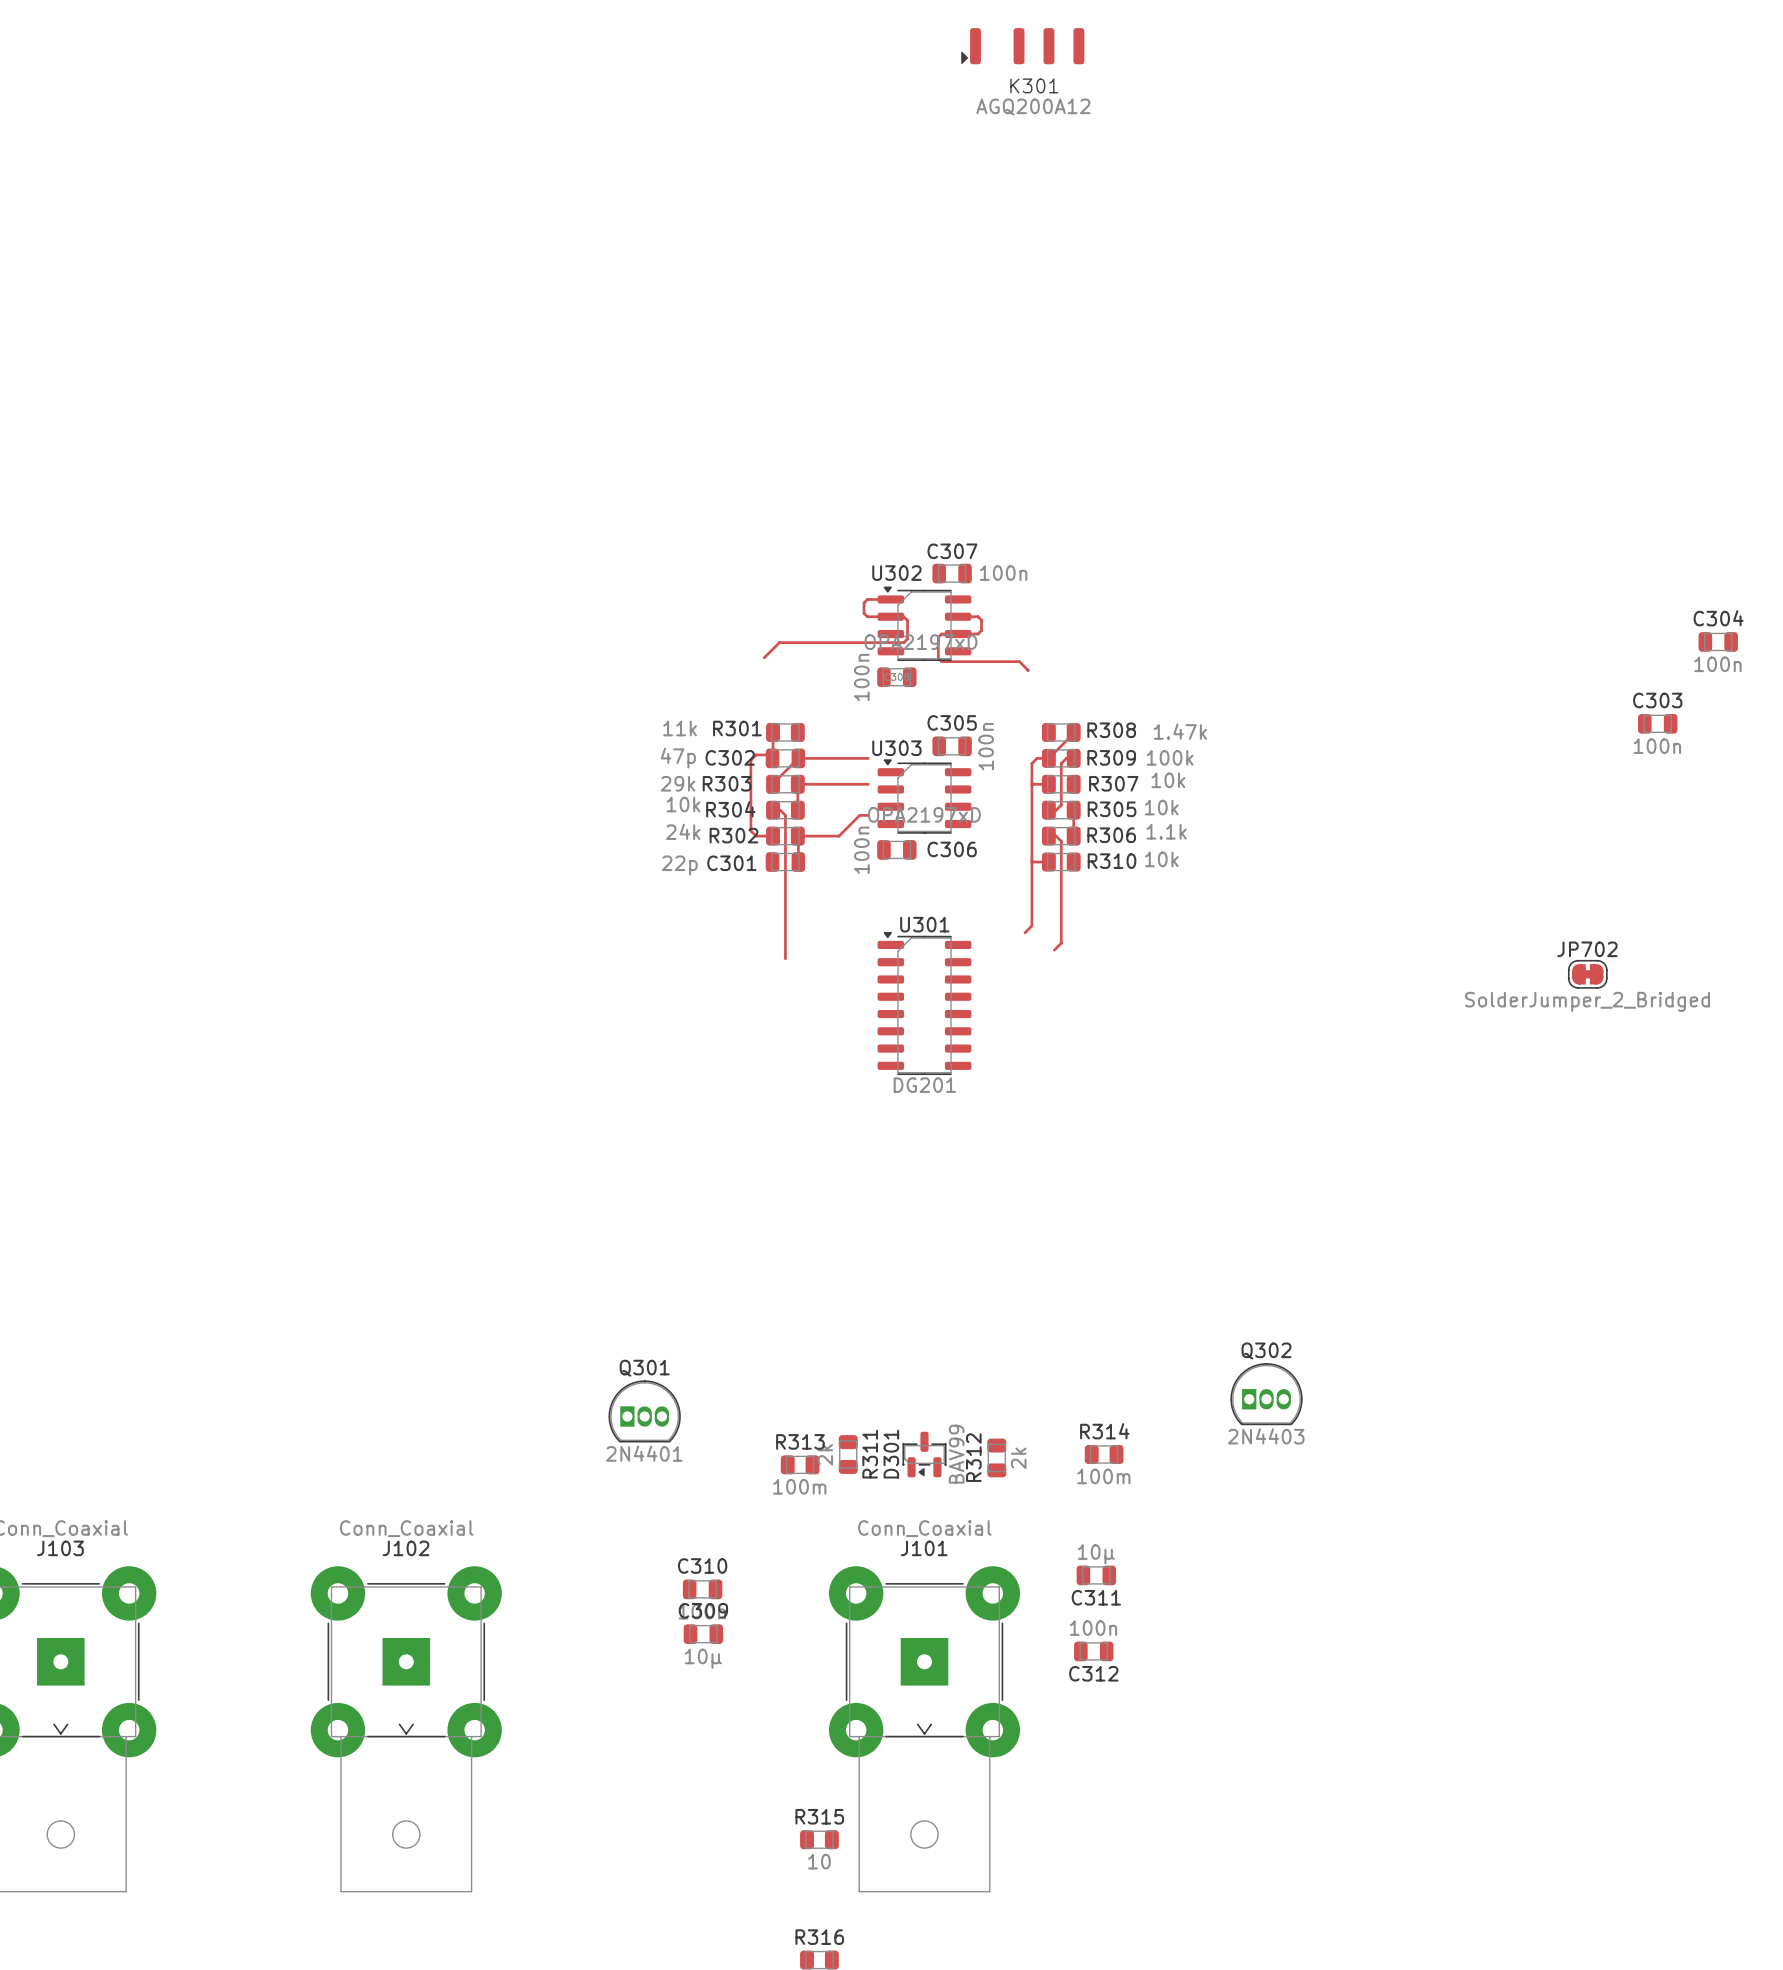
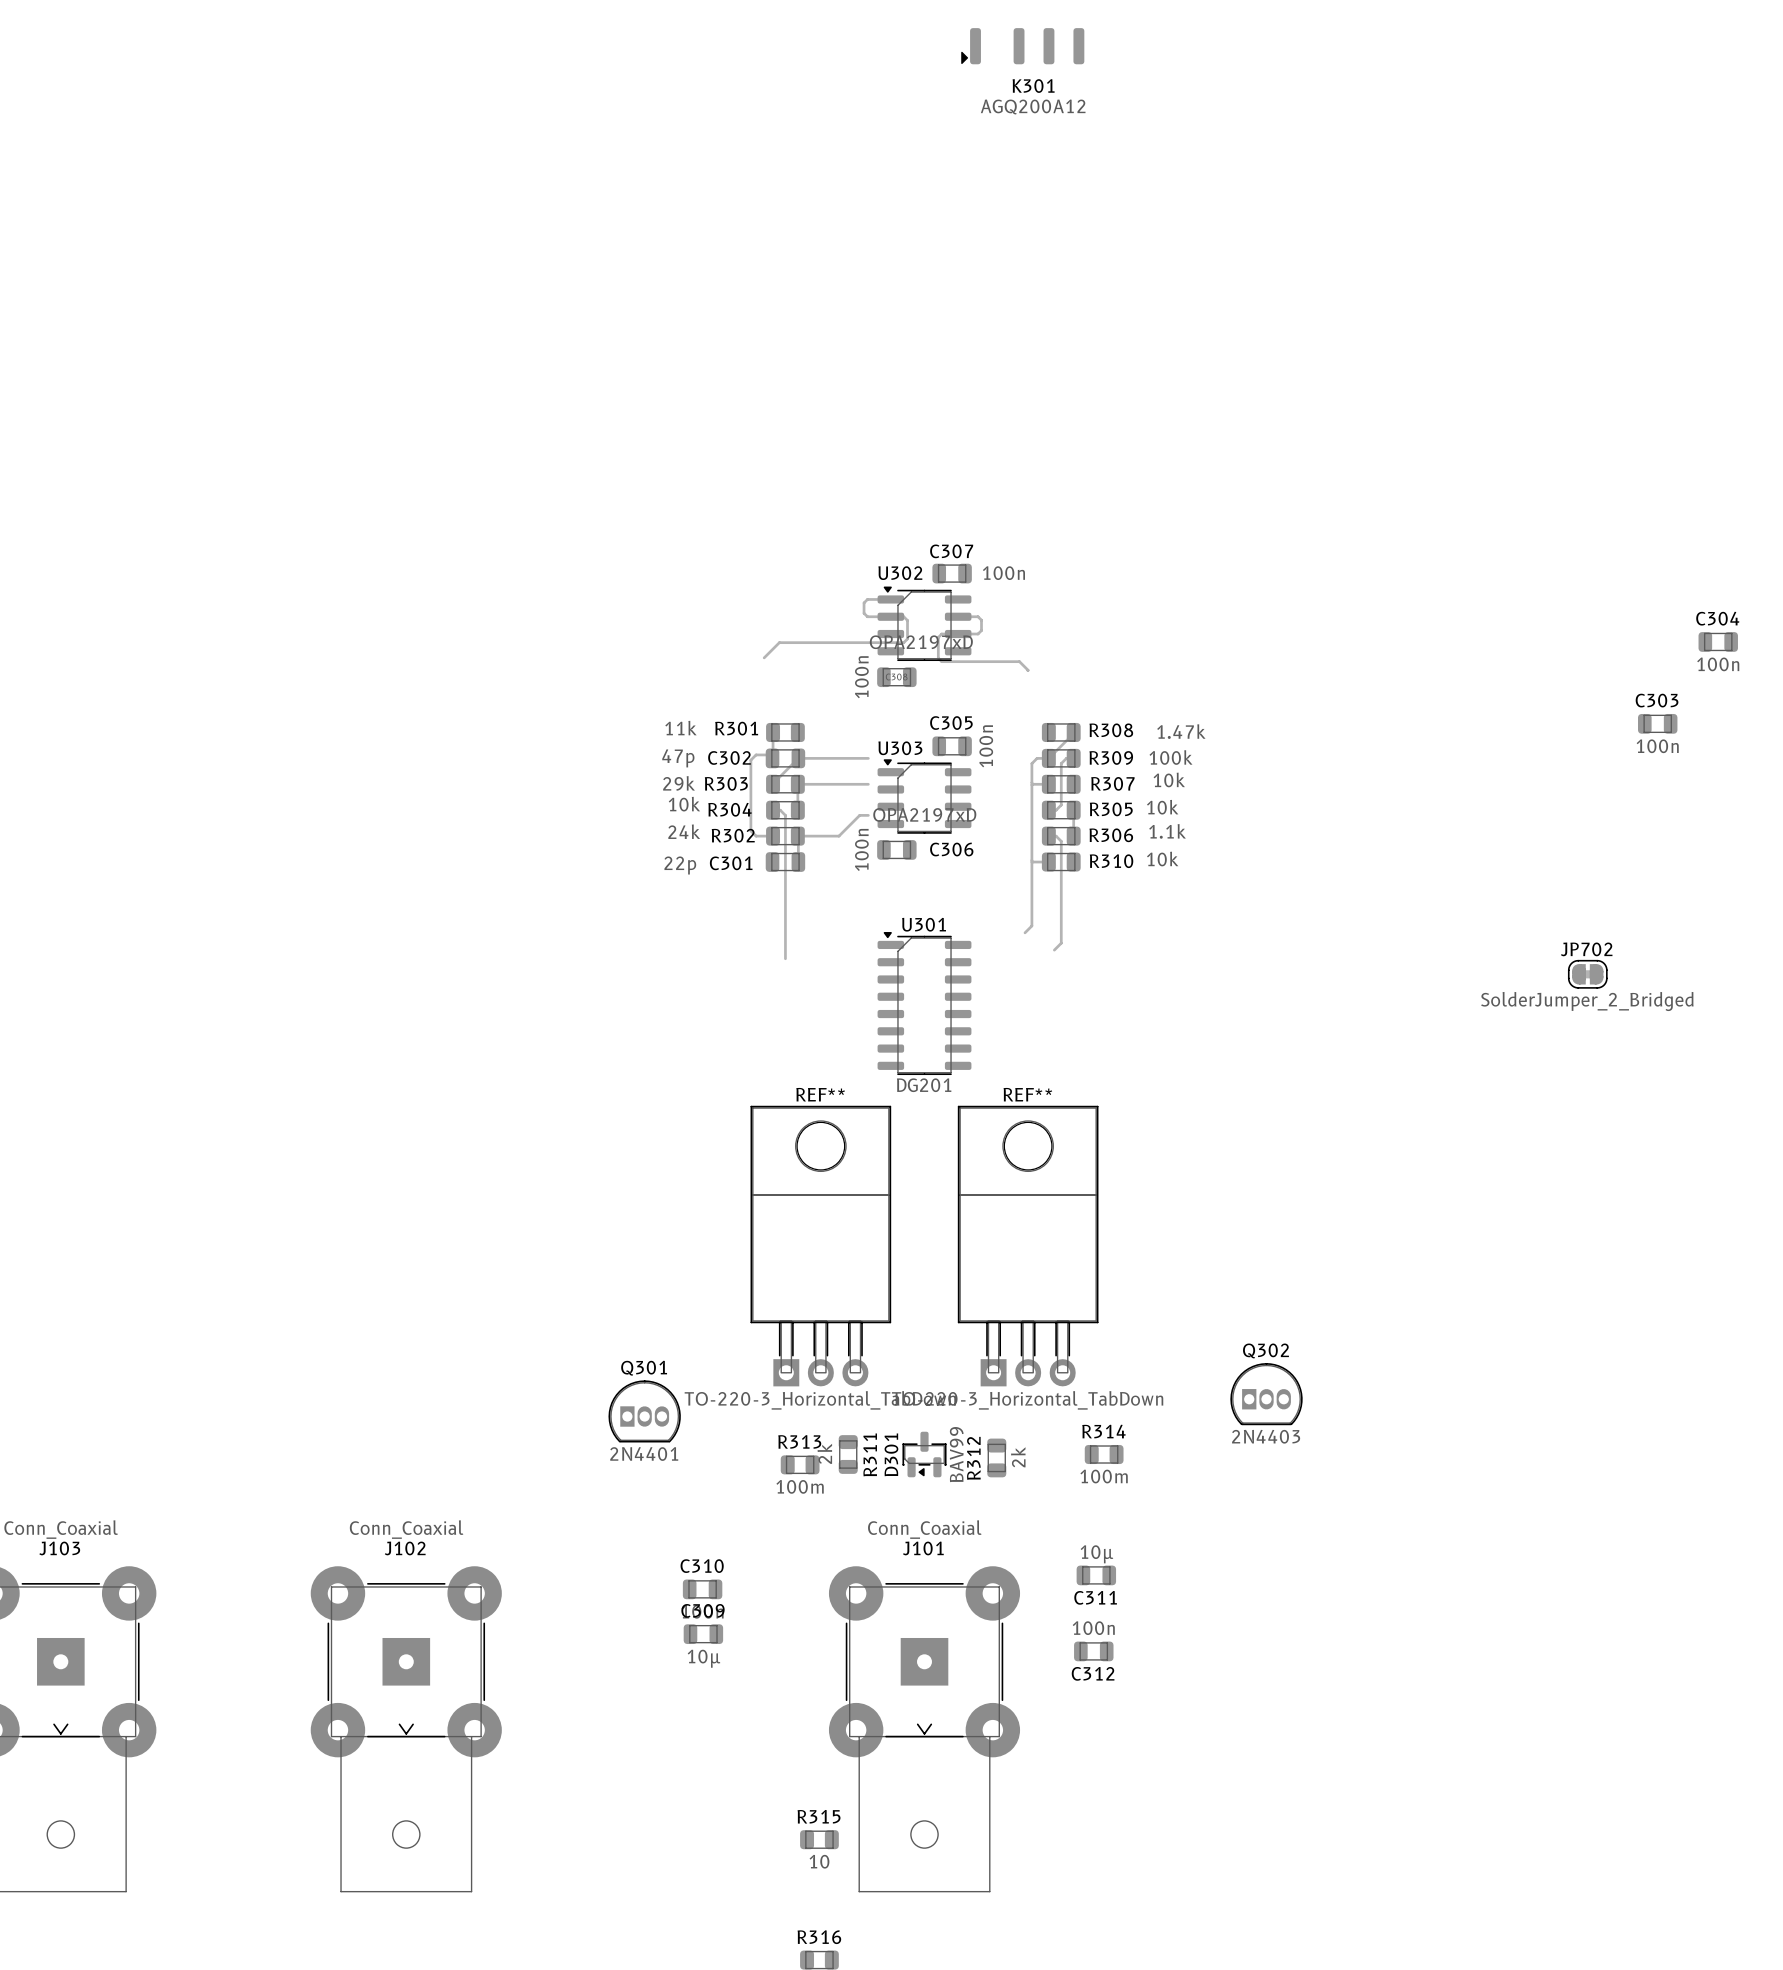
REF**: none -> TO-220-3_Horizontal_TabDown (820, 1246)
REF**: none -> TO-220-3_Horizontal_TabDown (1028, 1246)

